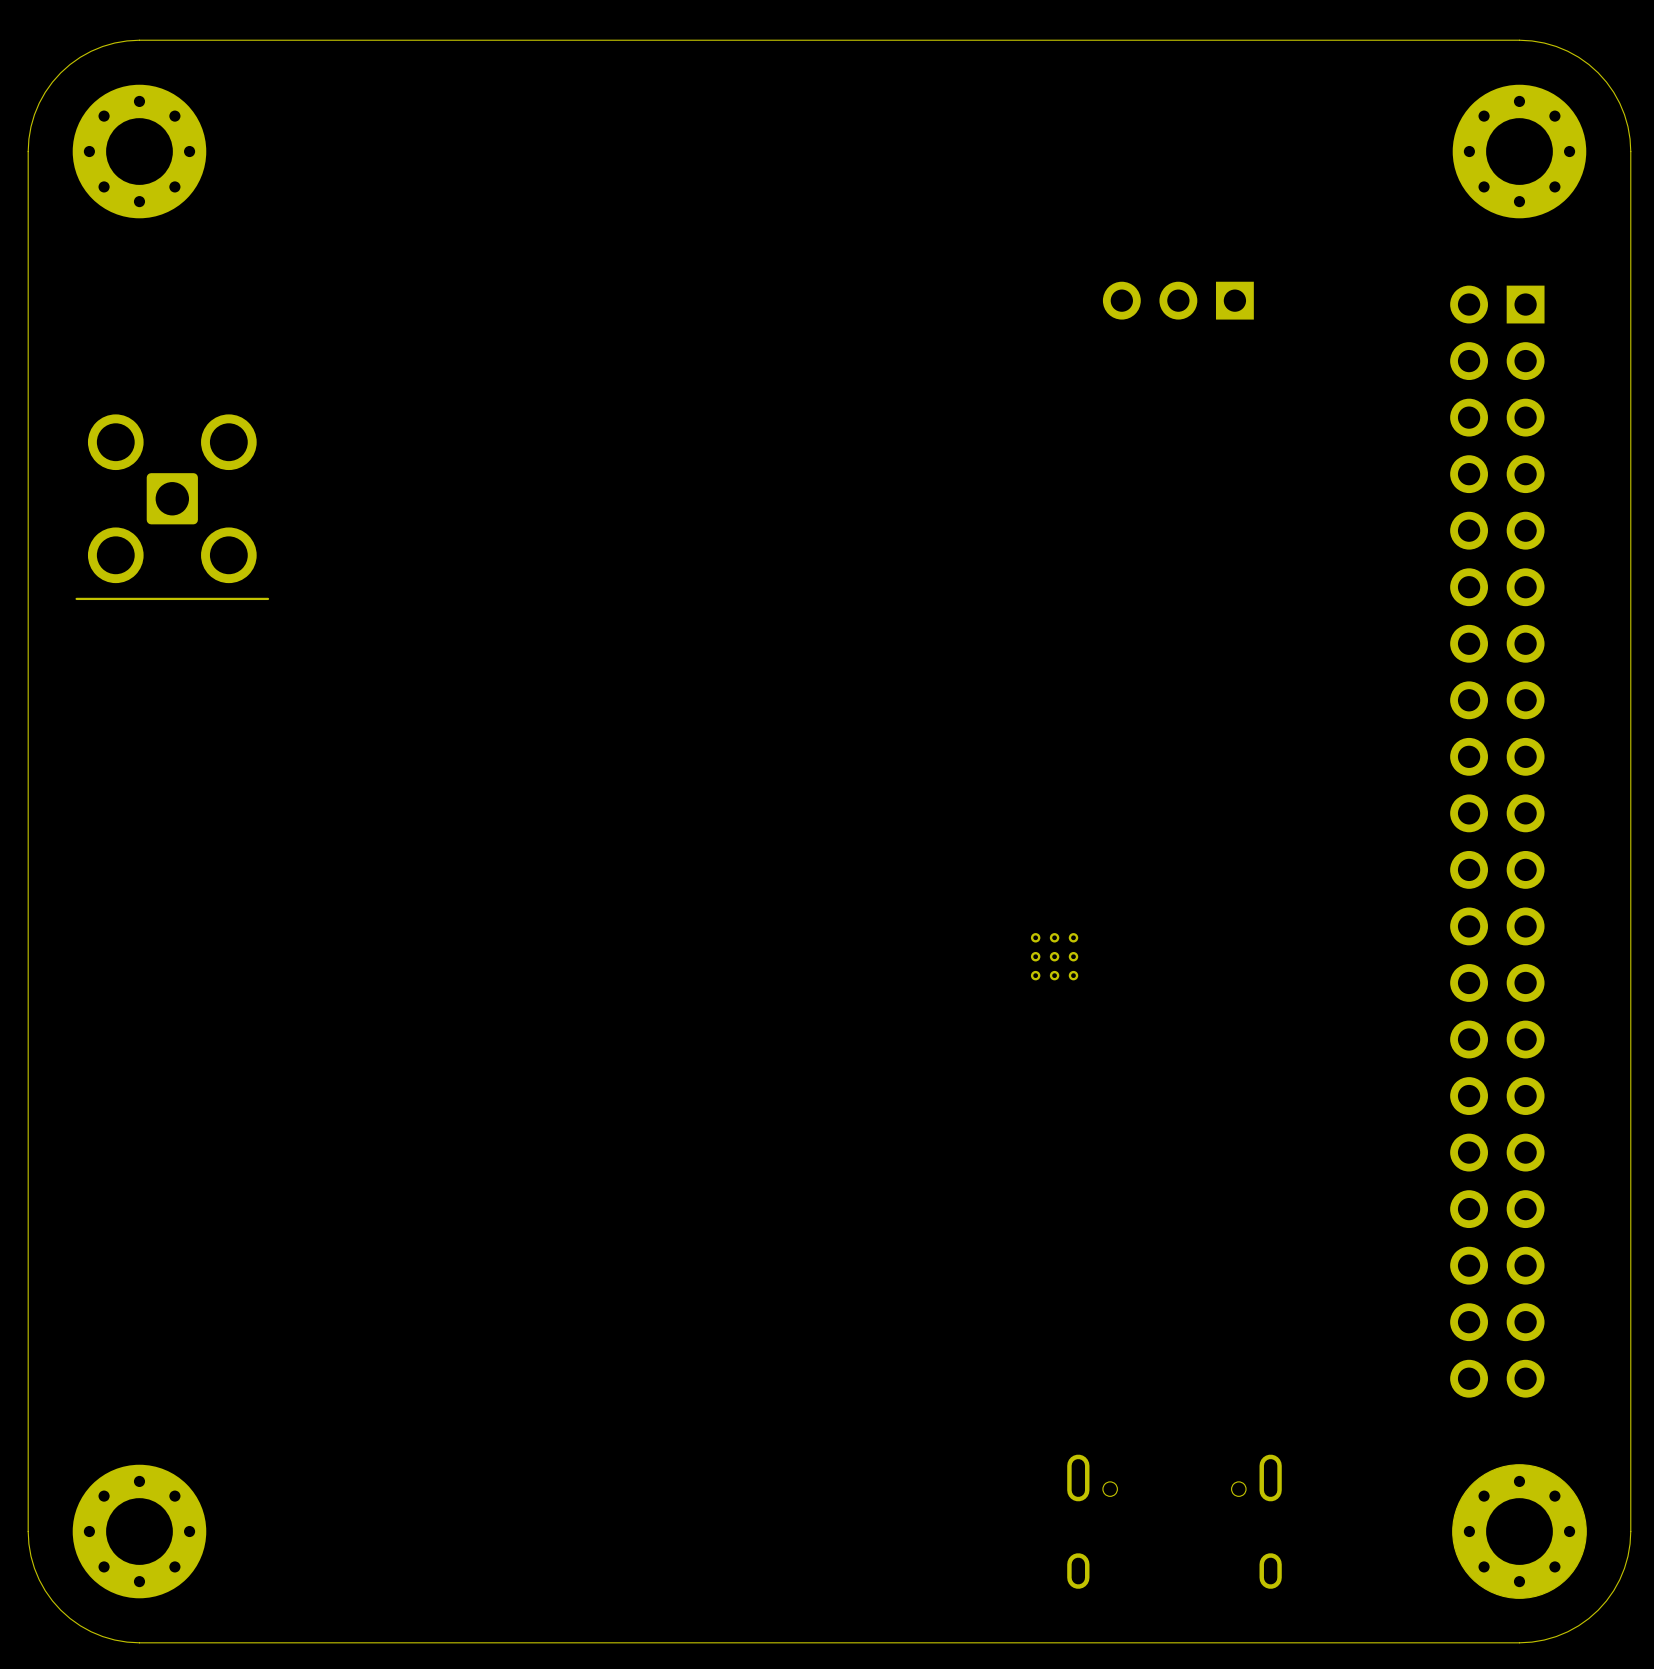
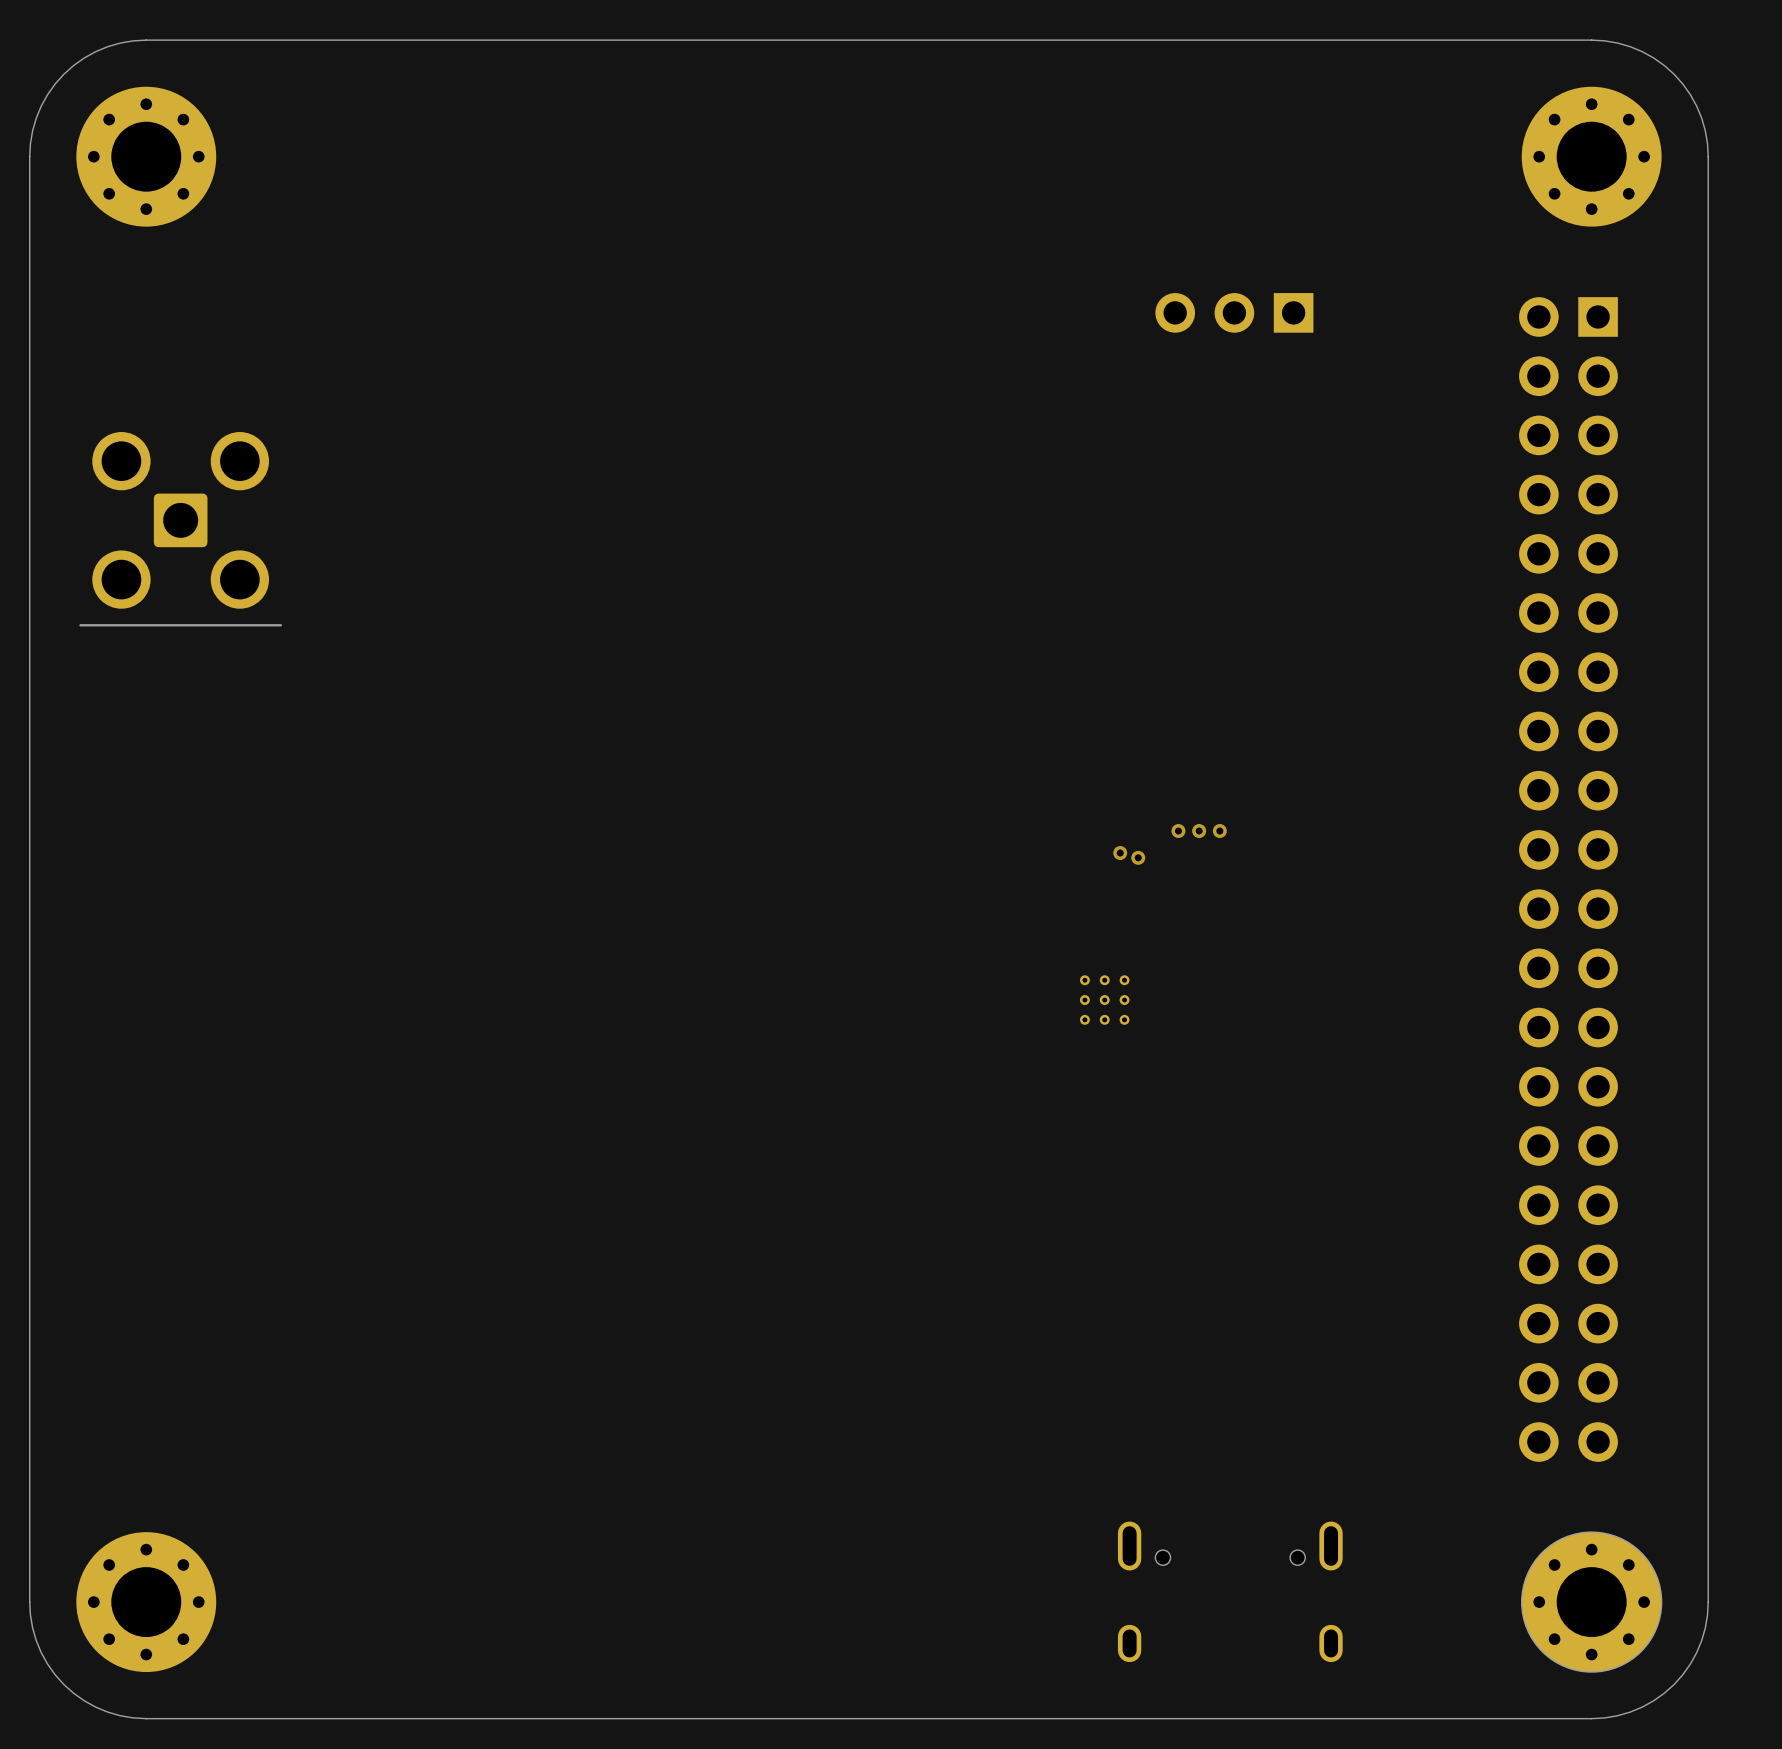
via: none -> (1178, 831)
via: none -> (1199, 831)
via: none -> (1219, 831)
via: none -> (1120, 853)
via: none -> (1138, 857)

